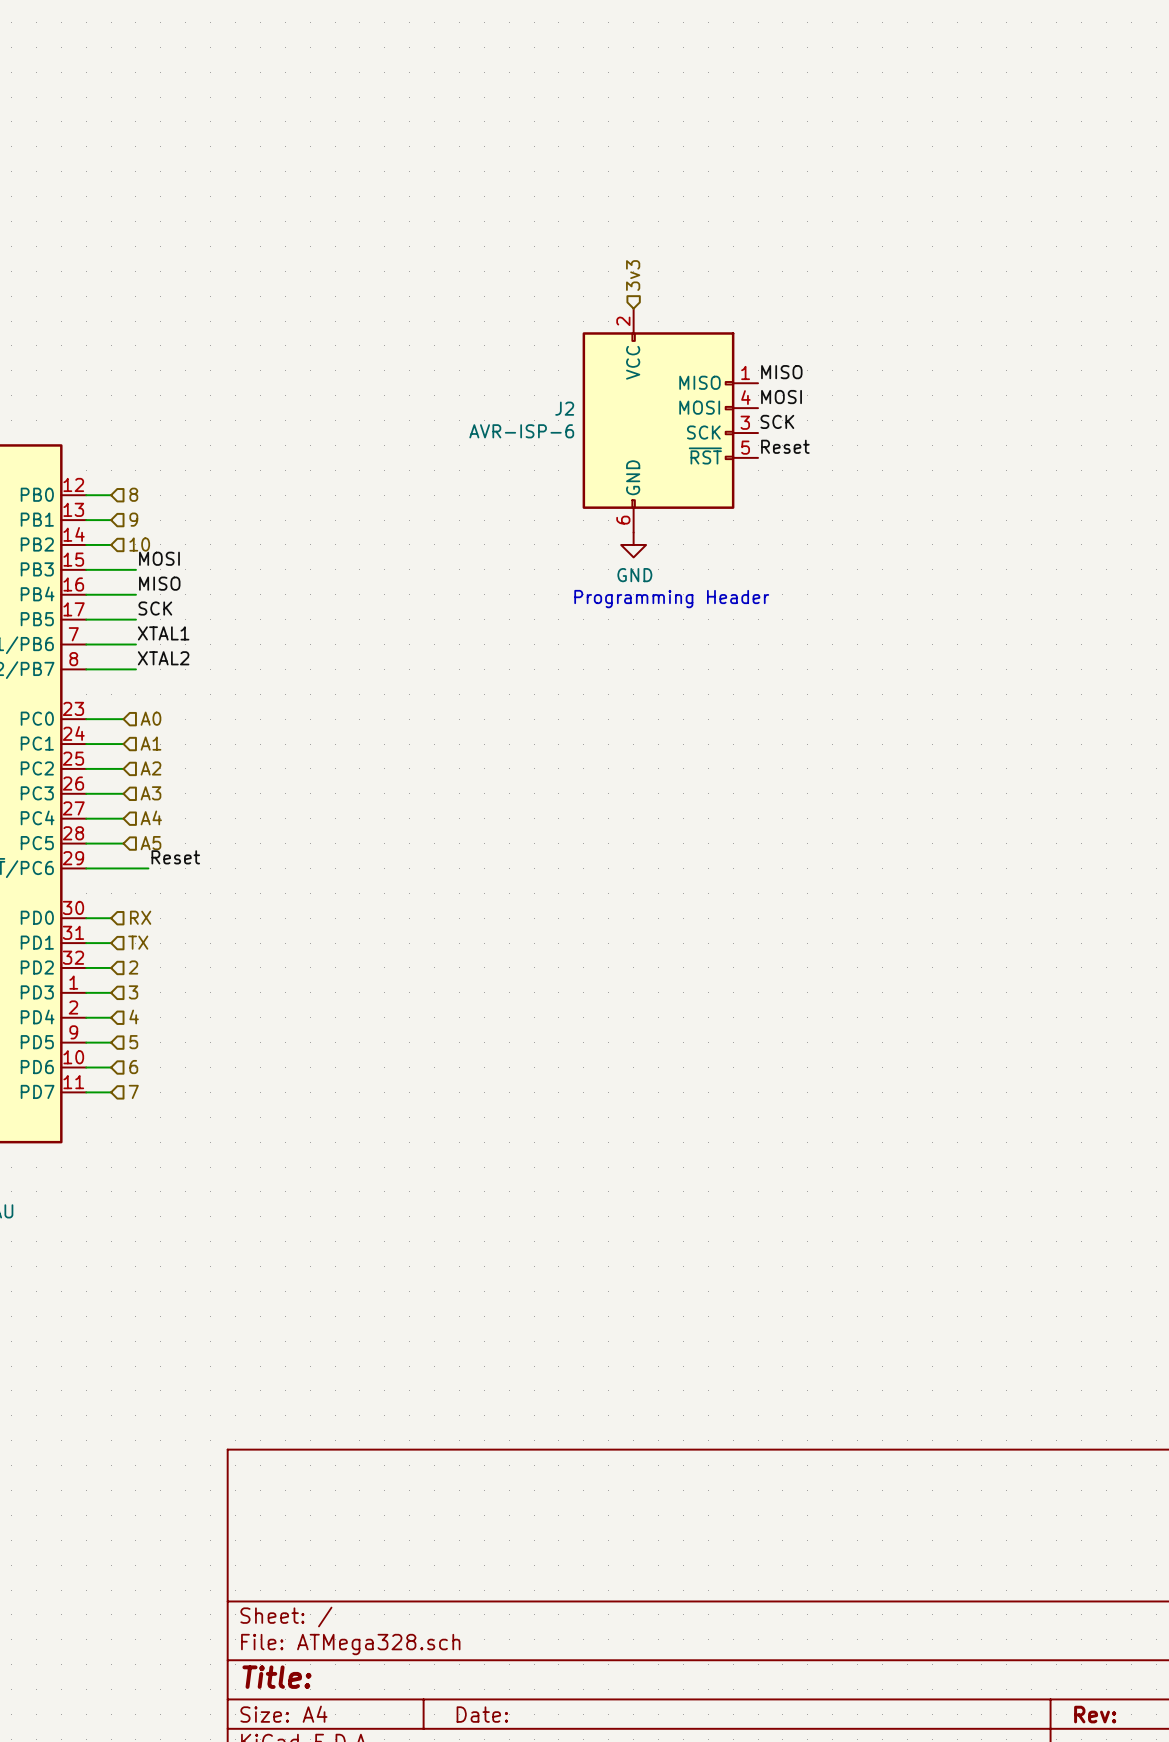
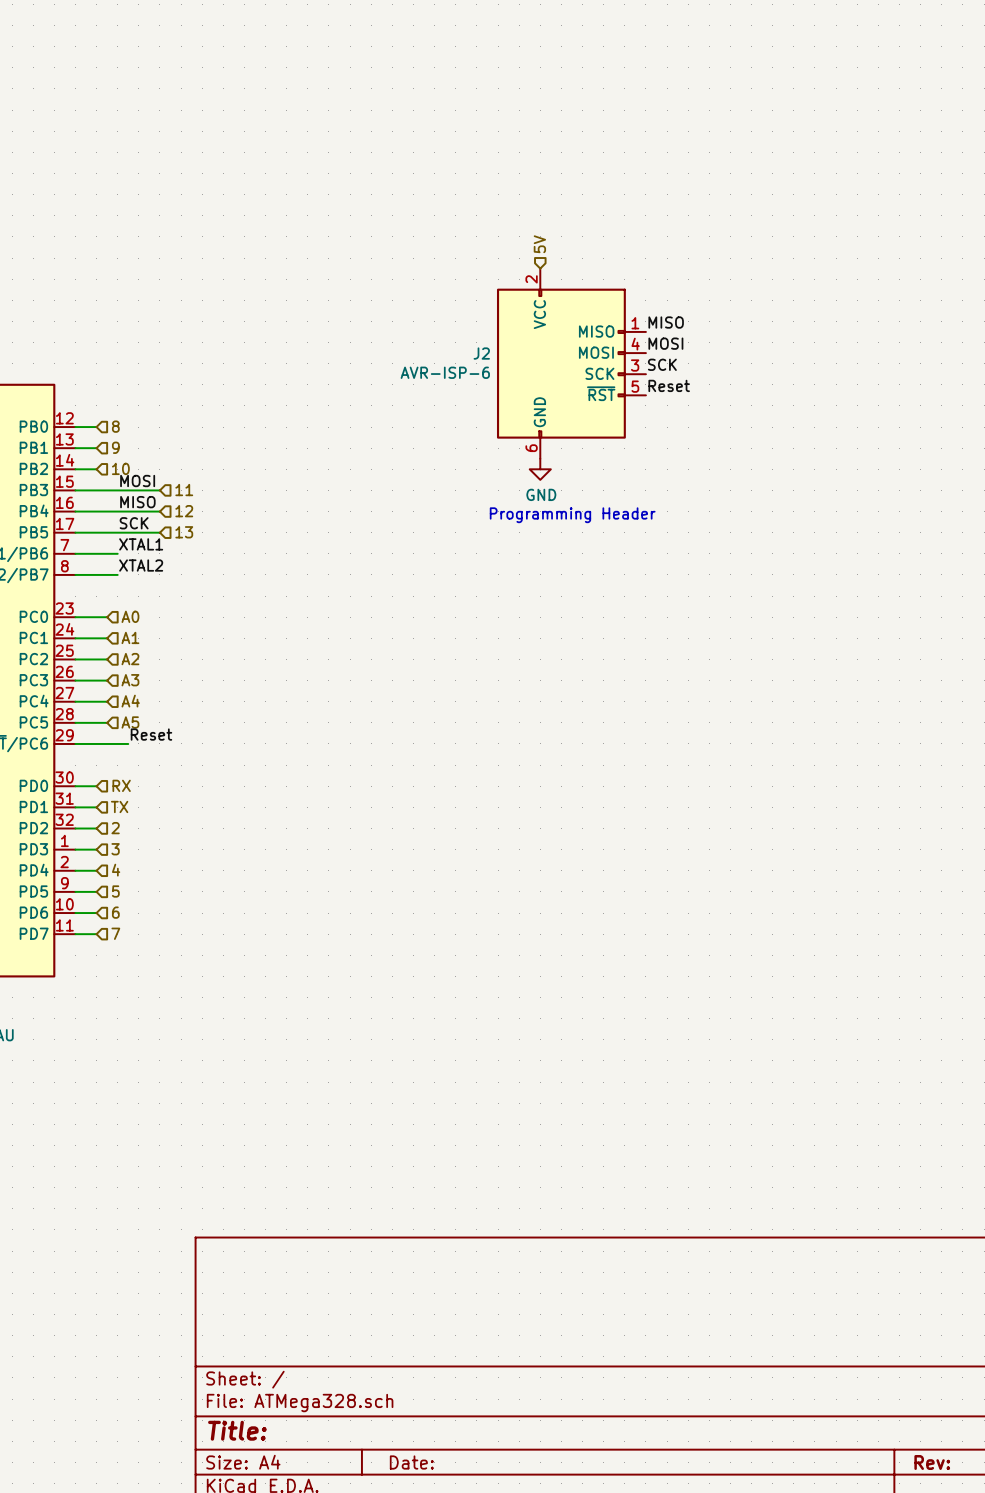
hierarchical label: 3v3 (633, 275) -> 5V (539, 244)
wire: none -> (117, 490) (159, 490)
hierarchical label: none -> 11 (184, 490)
wire: none -> (117, 511) (159, 511)
hierarchical label: none -> 12 (184, 511)
wire: none -> (117, 532) (159, 532)
hierarchical label: none -> 13 (184, 532)

